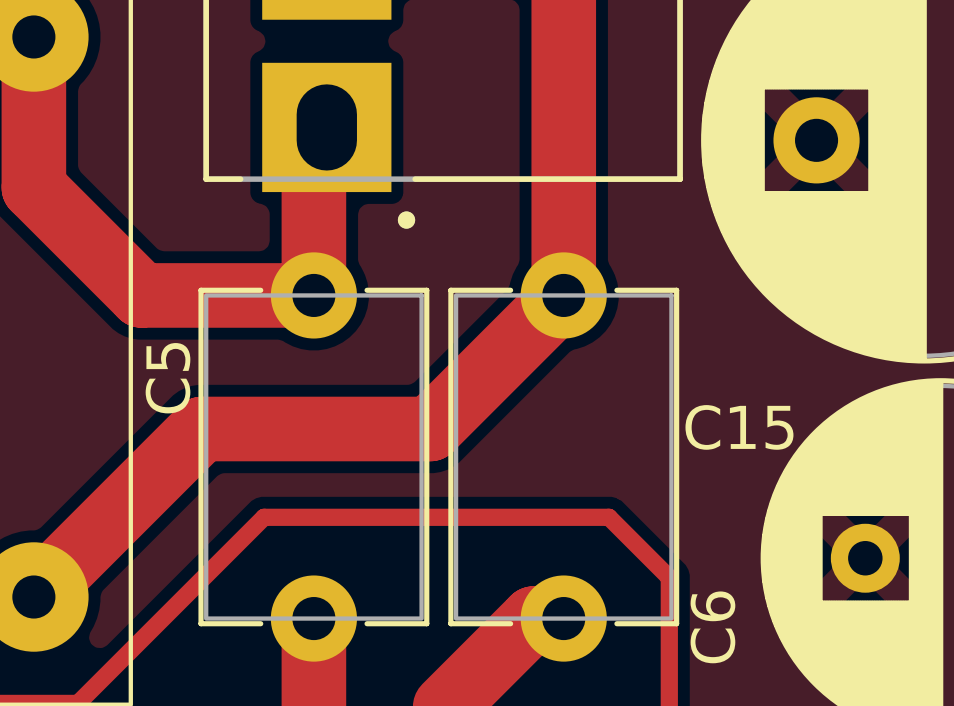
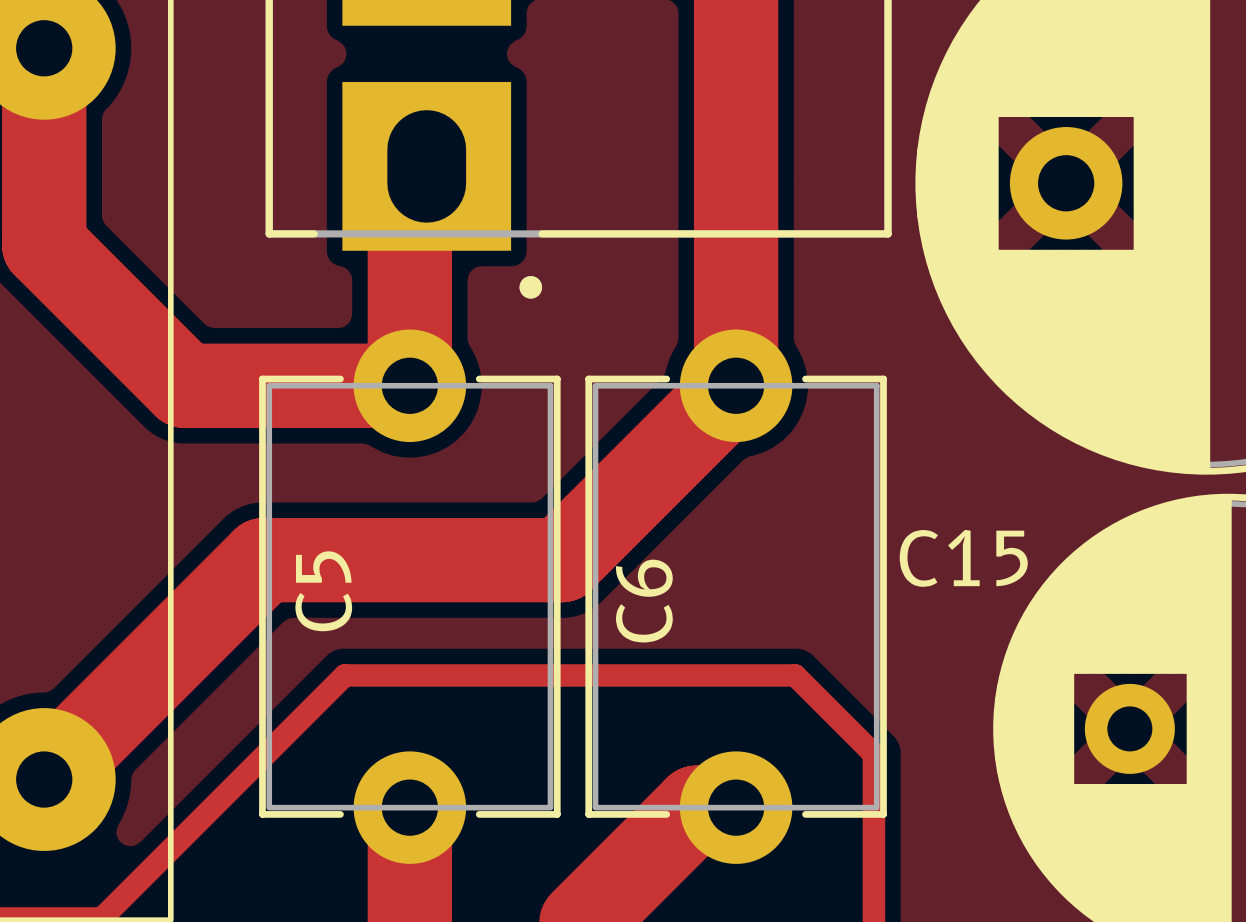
C5 name position: C5 (168, 378) -> C5 (323, 591)
C6 name position: C6 (712, 627) -> C6 (644, 601)

